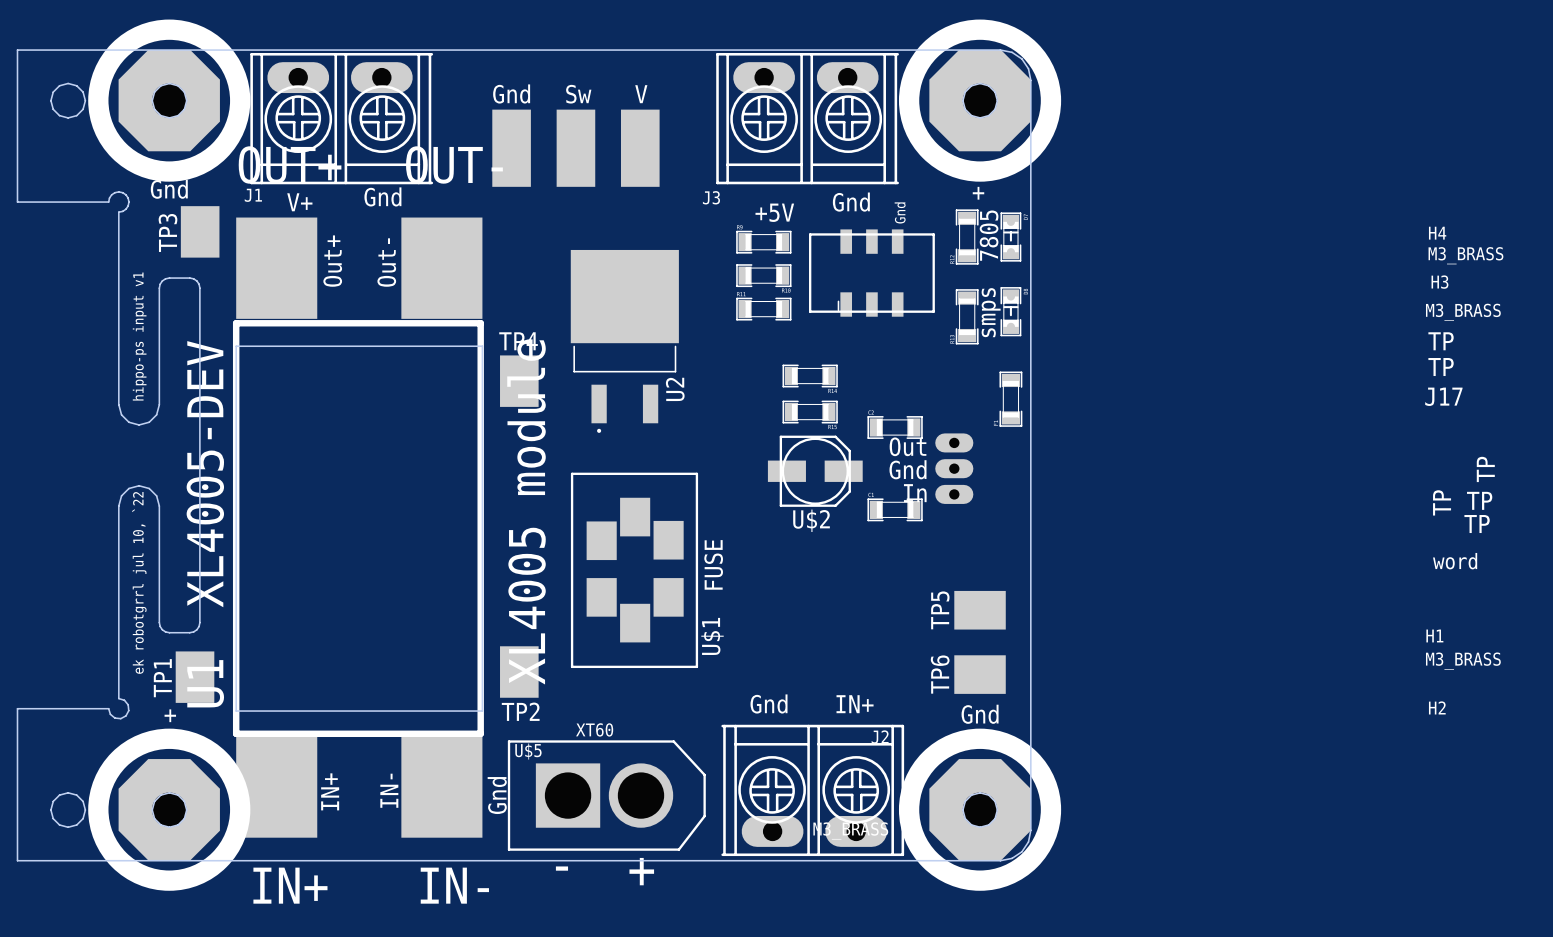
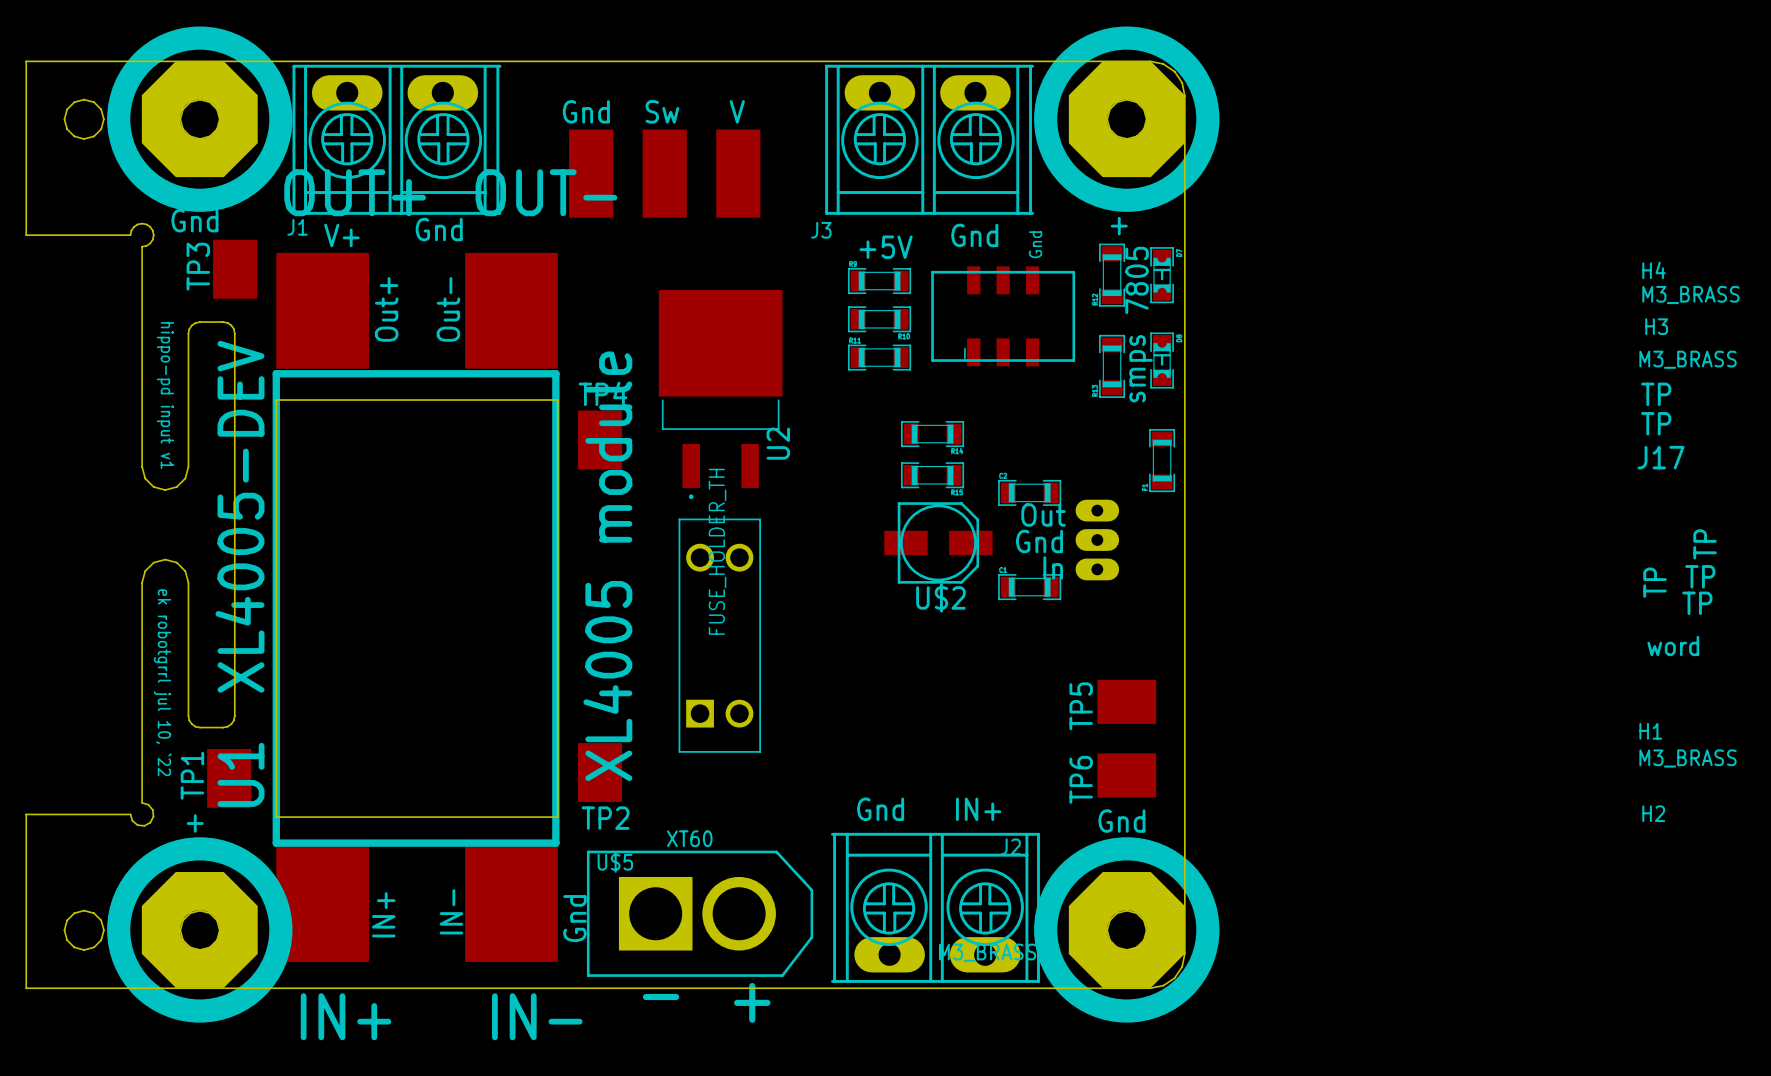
text: hippo-ps input v1 (139, 336) -> hippo-pd input v1 (165, 395)
part: none -> FUSE_HOLDER_TH (719, 635)
U$1: FUSE (634, 570) -> none
text rotation: 0° (139, 582) -> 180° (162, 682)

